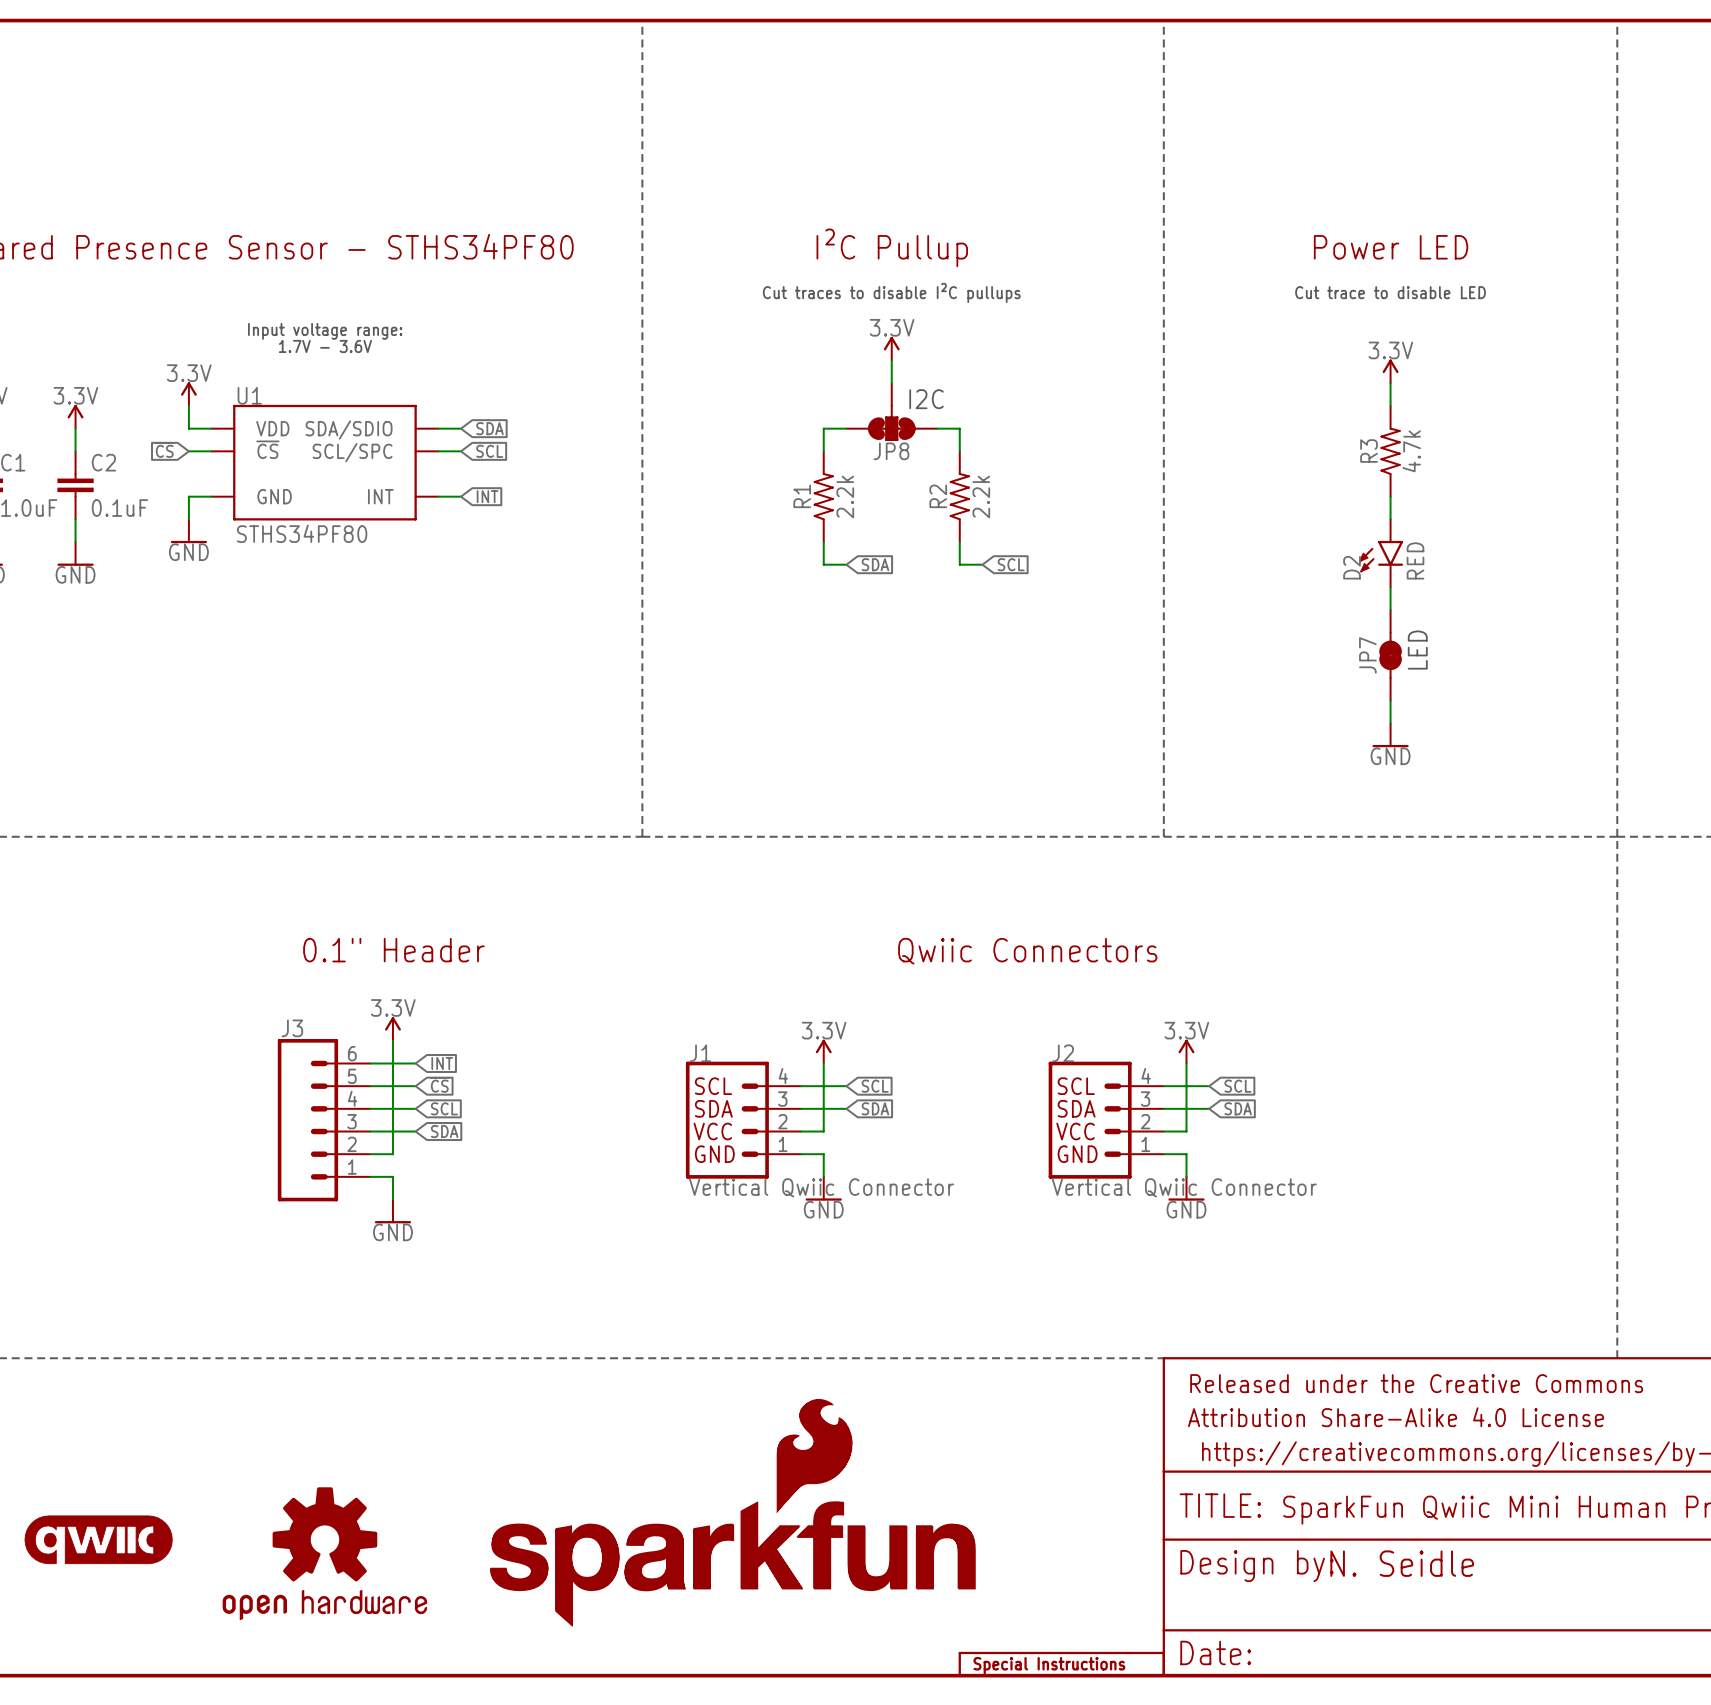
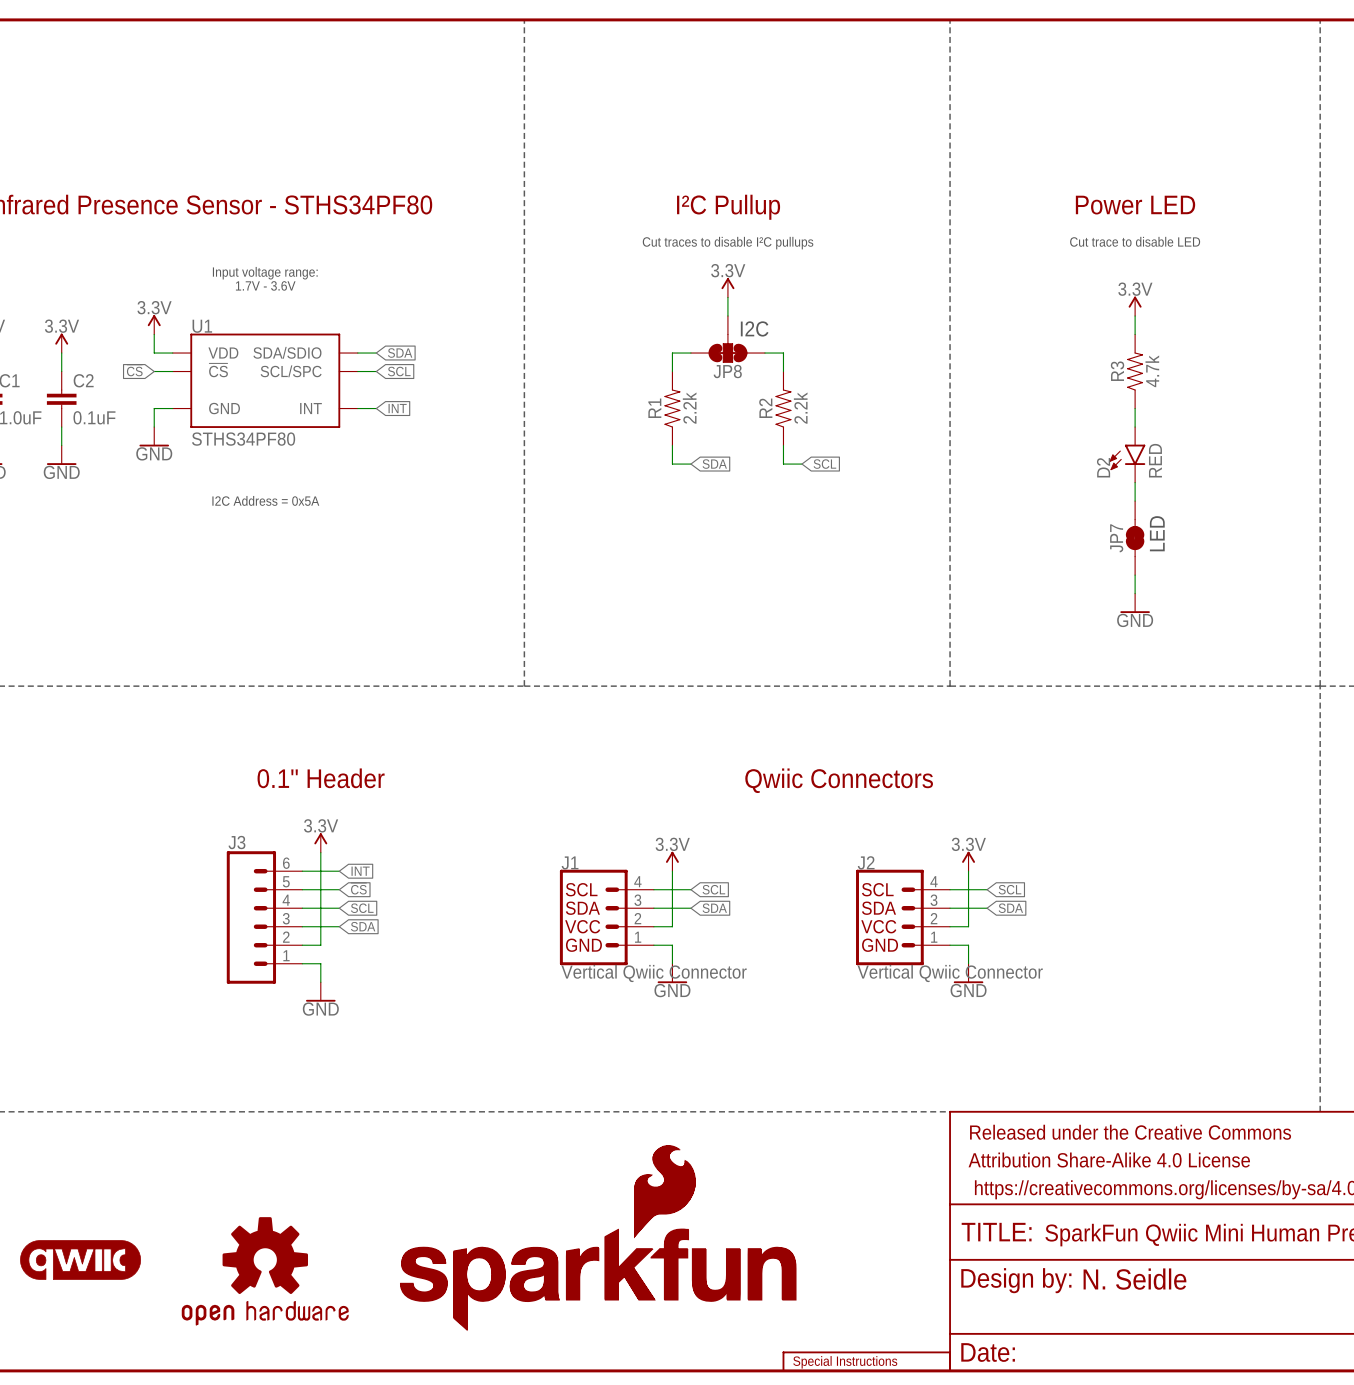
text: none -> I2C Address = 0x5A (265, 500)

